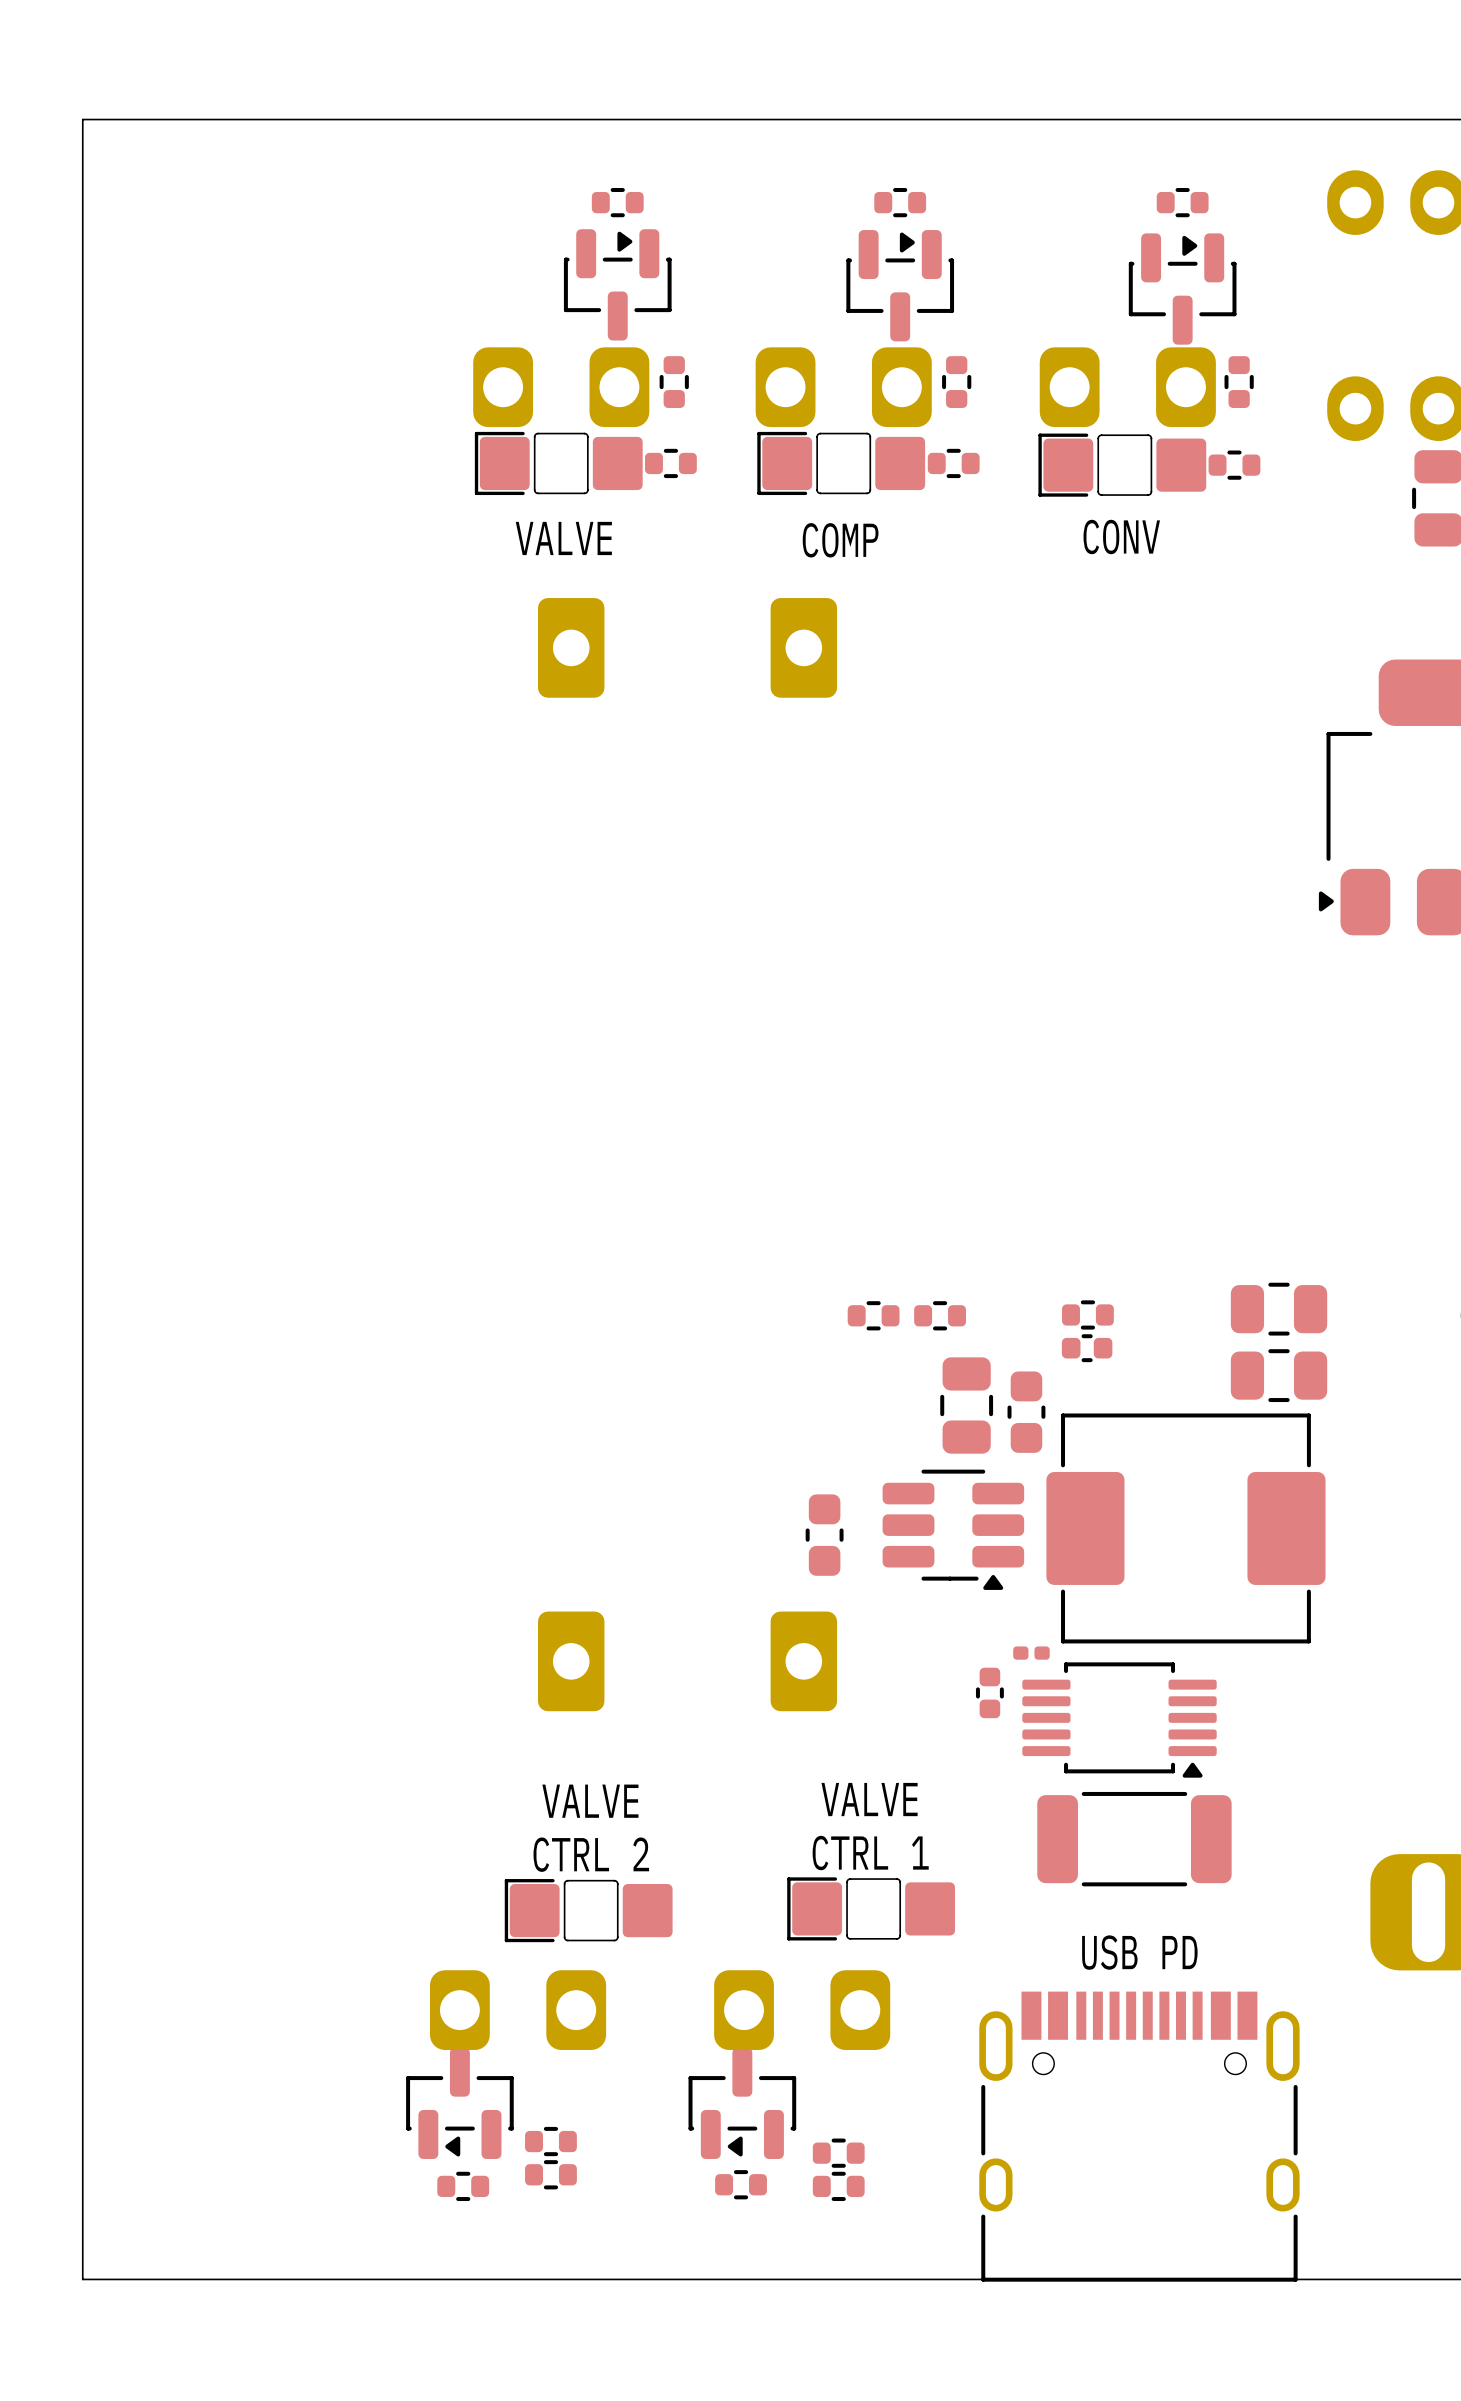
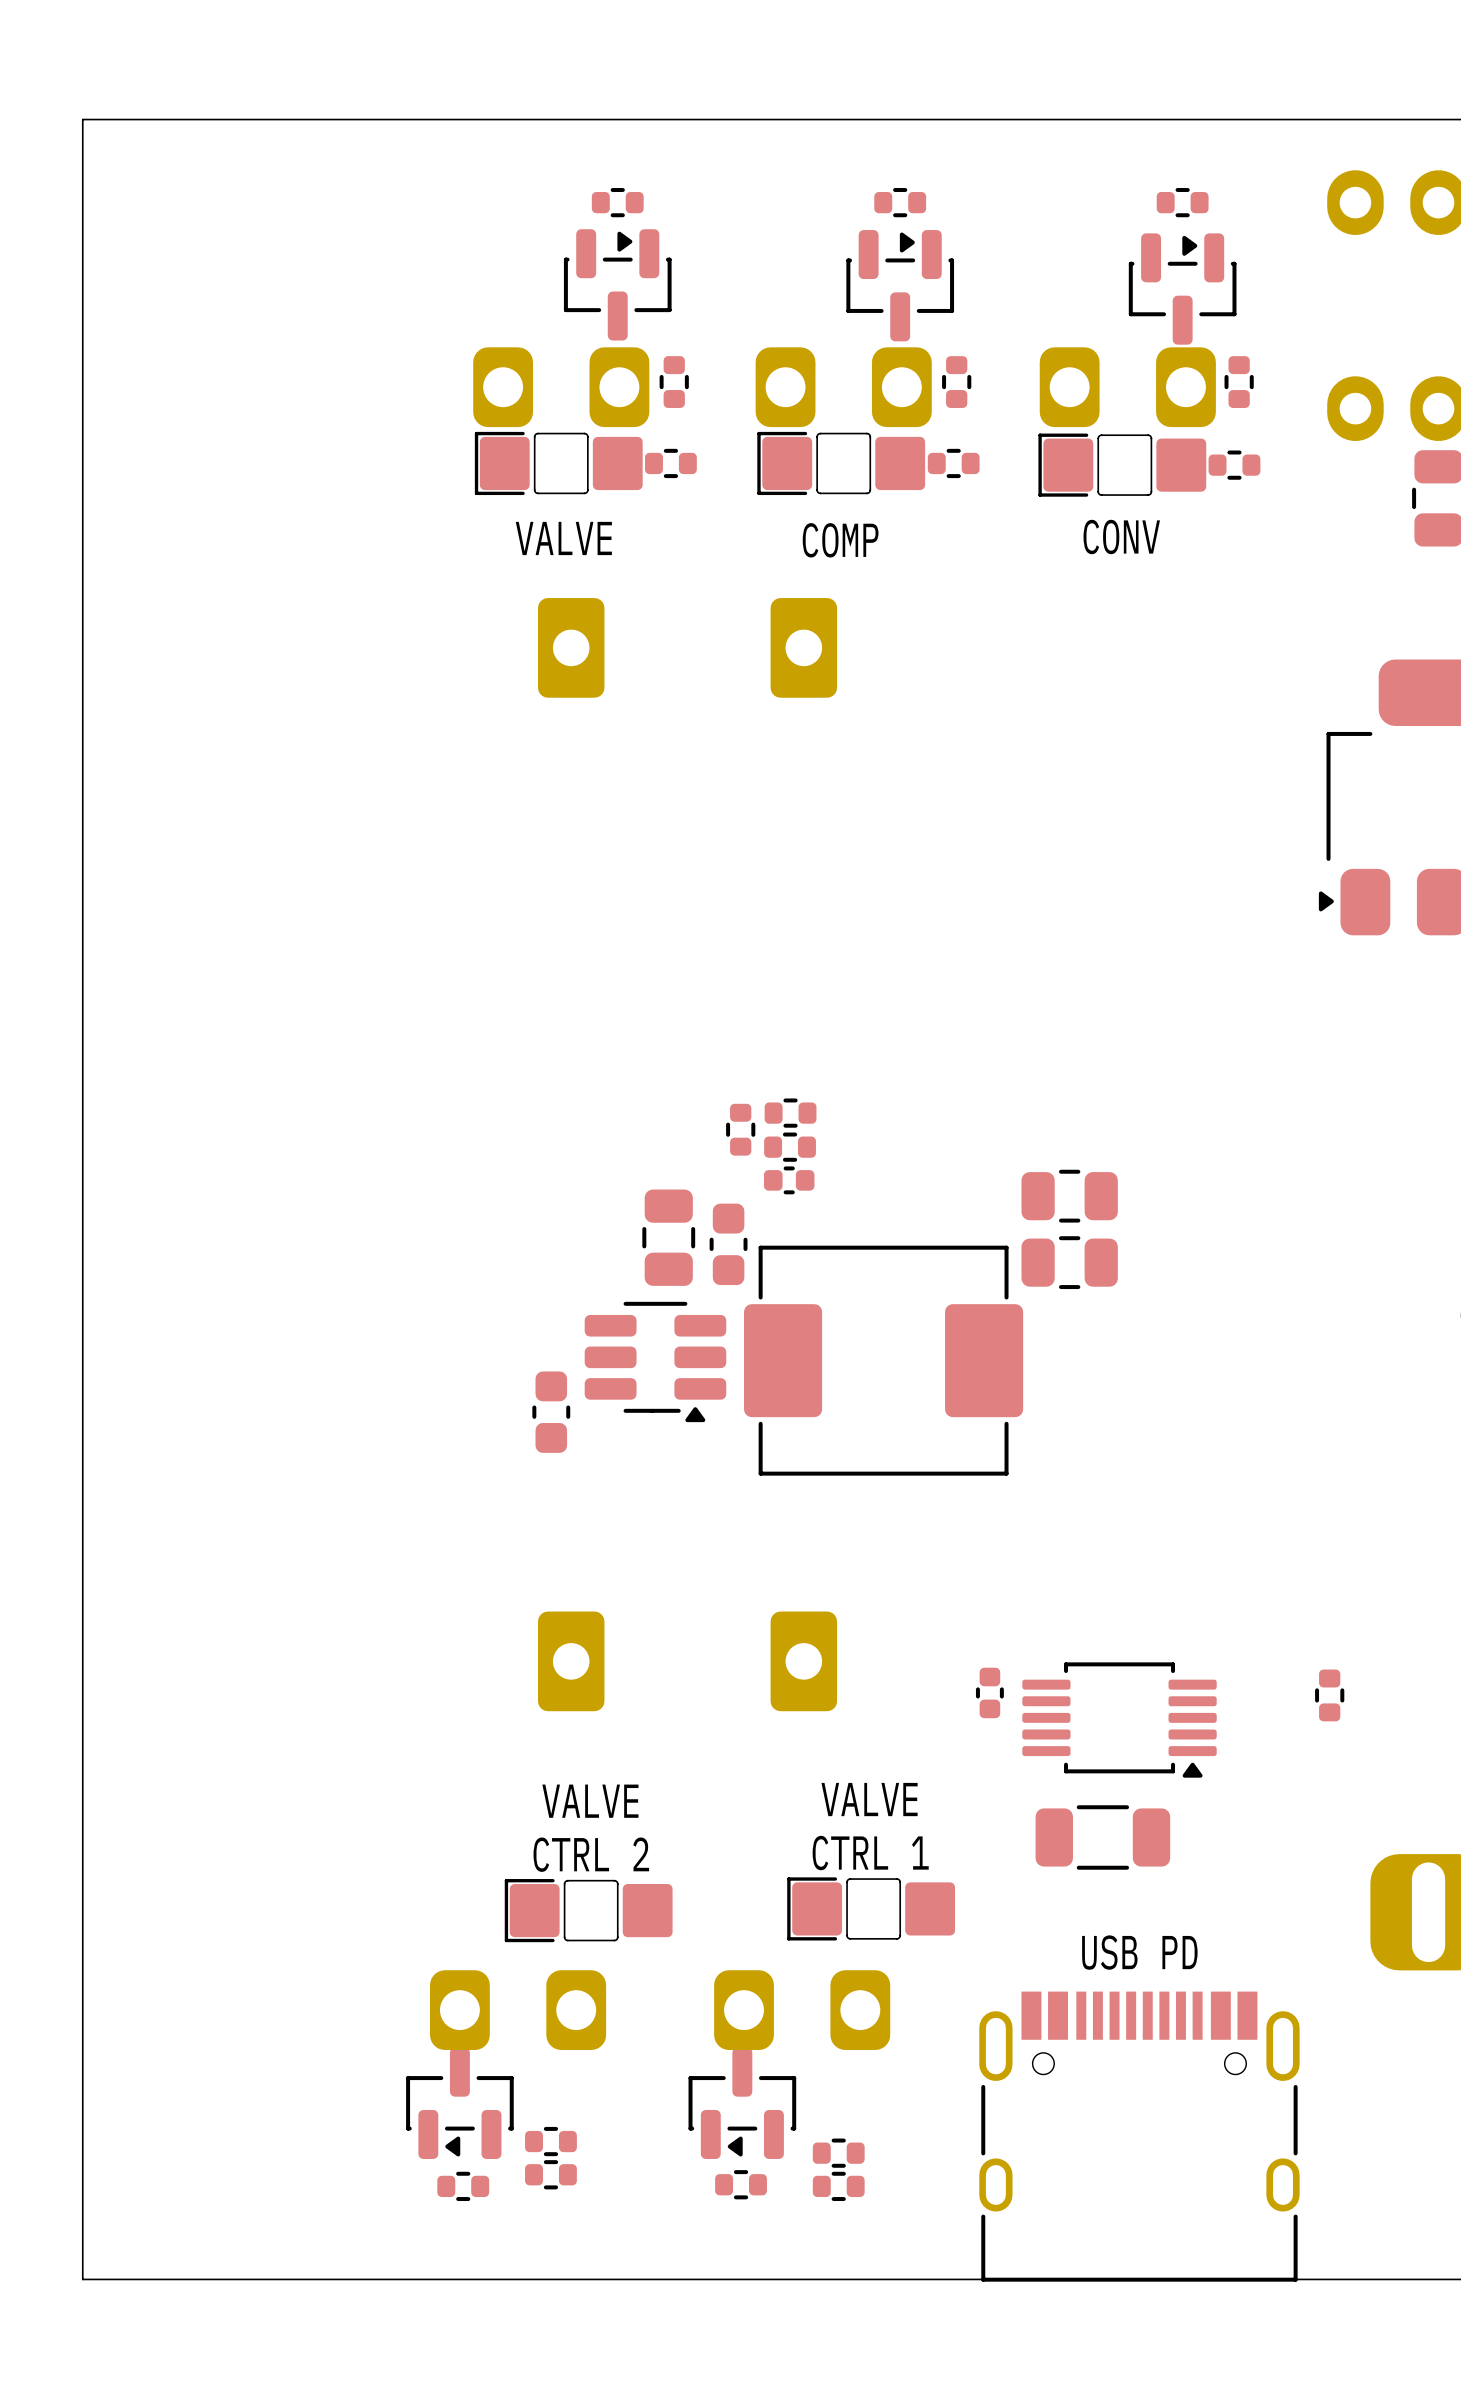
part: none -> (790, 1113)
part: none -> (740, 1129)
part: none -> (790, 1147)
part: none -> (1069, 1196)
part: none -> (668, 1237)
part: none -> (728, 1244)
part: none -> (1069, 1262)
part: (1279, 1309) -> none
part: (1087, 1314) -> none
part: (873, 1315) -> none
part: (940, 1315) -> none
part position: (1087, 1348) -> (789, 1180)
part: (1279, 1375) -> none
part: (966, 1405) -> none
part: none -> (551, 1412)
part: (1026, 1412) -> none
part position: (1185, 1528) -> (883, 1360)
part position: (953, 1529) -> (655, 1361)
part: (824, 1535) -> none
part: (1031, 1653) -> none
part: none -> (1329, 1695)
part footprint: [1037, 1791, 1232, 1887] -> [1035, 1805, 1171, 1870]

